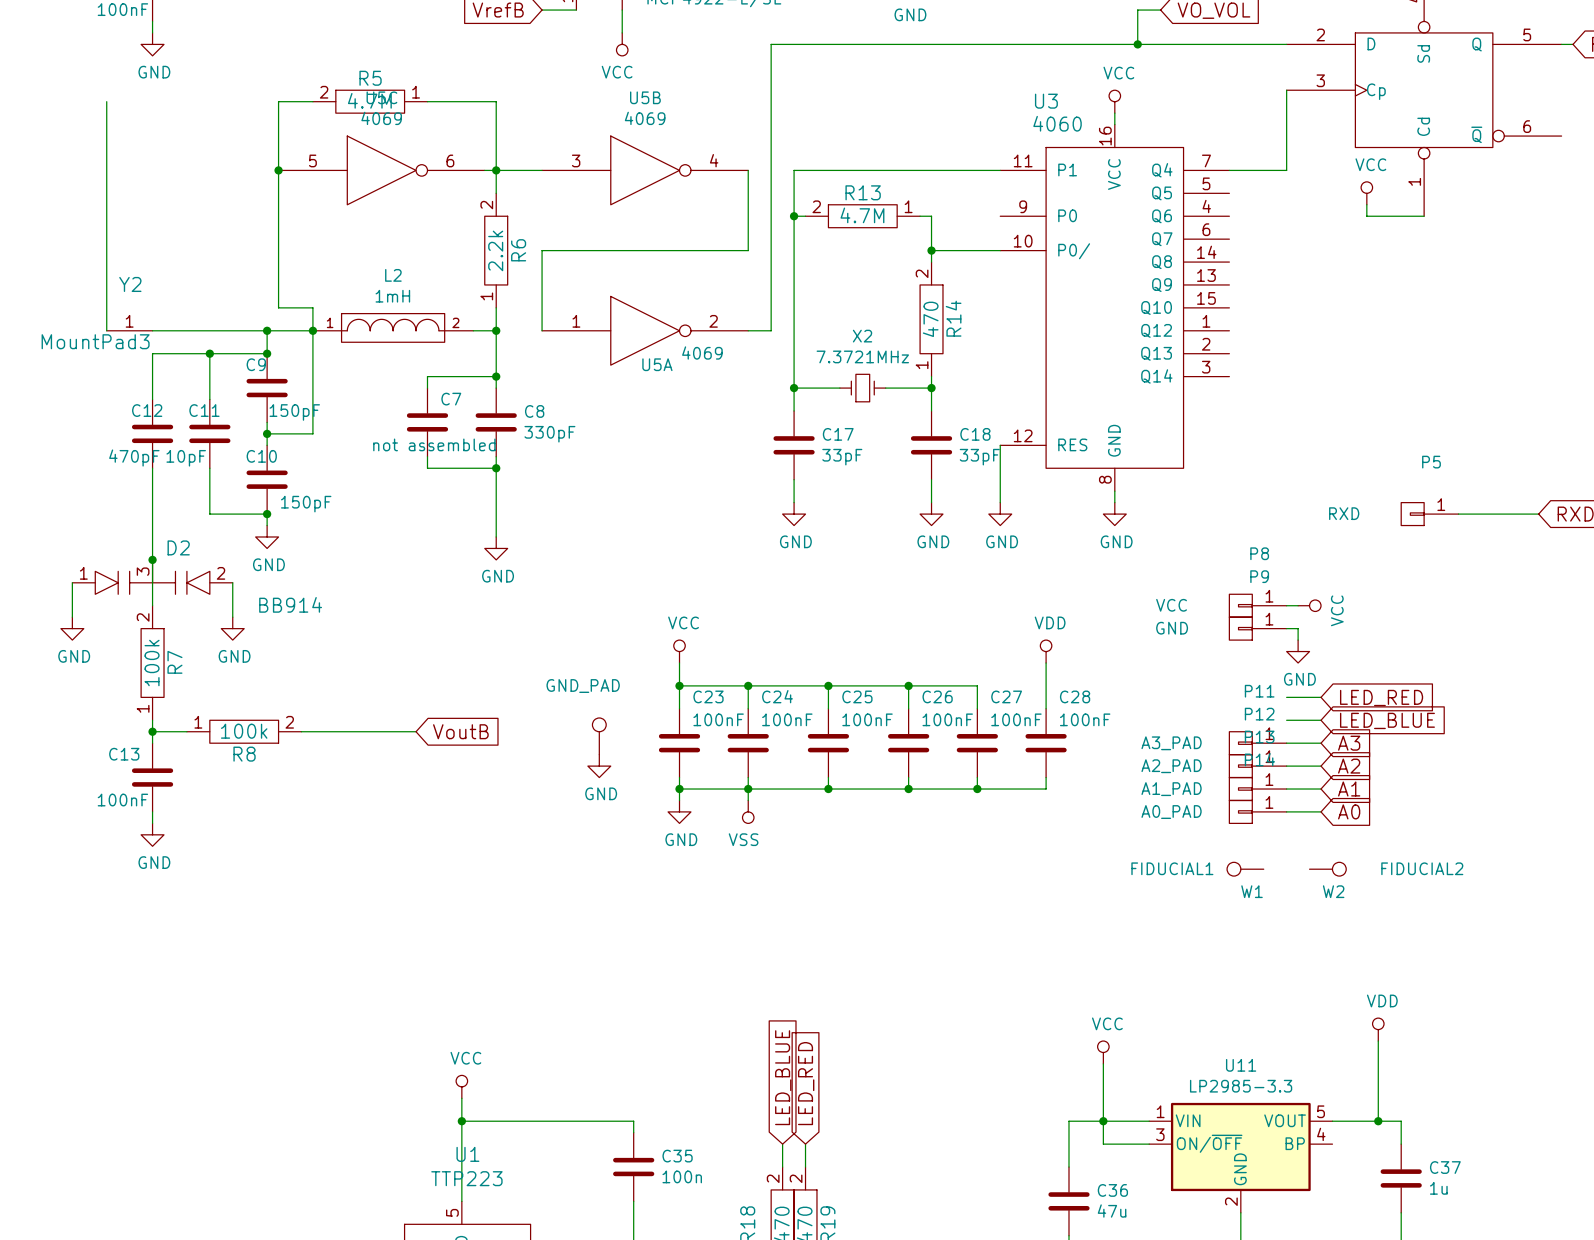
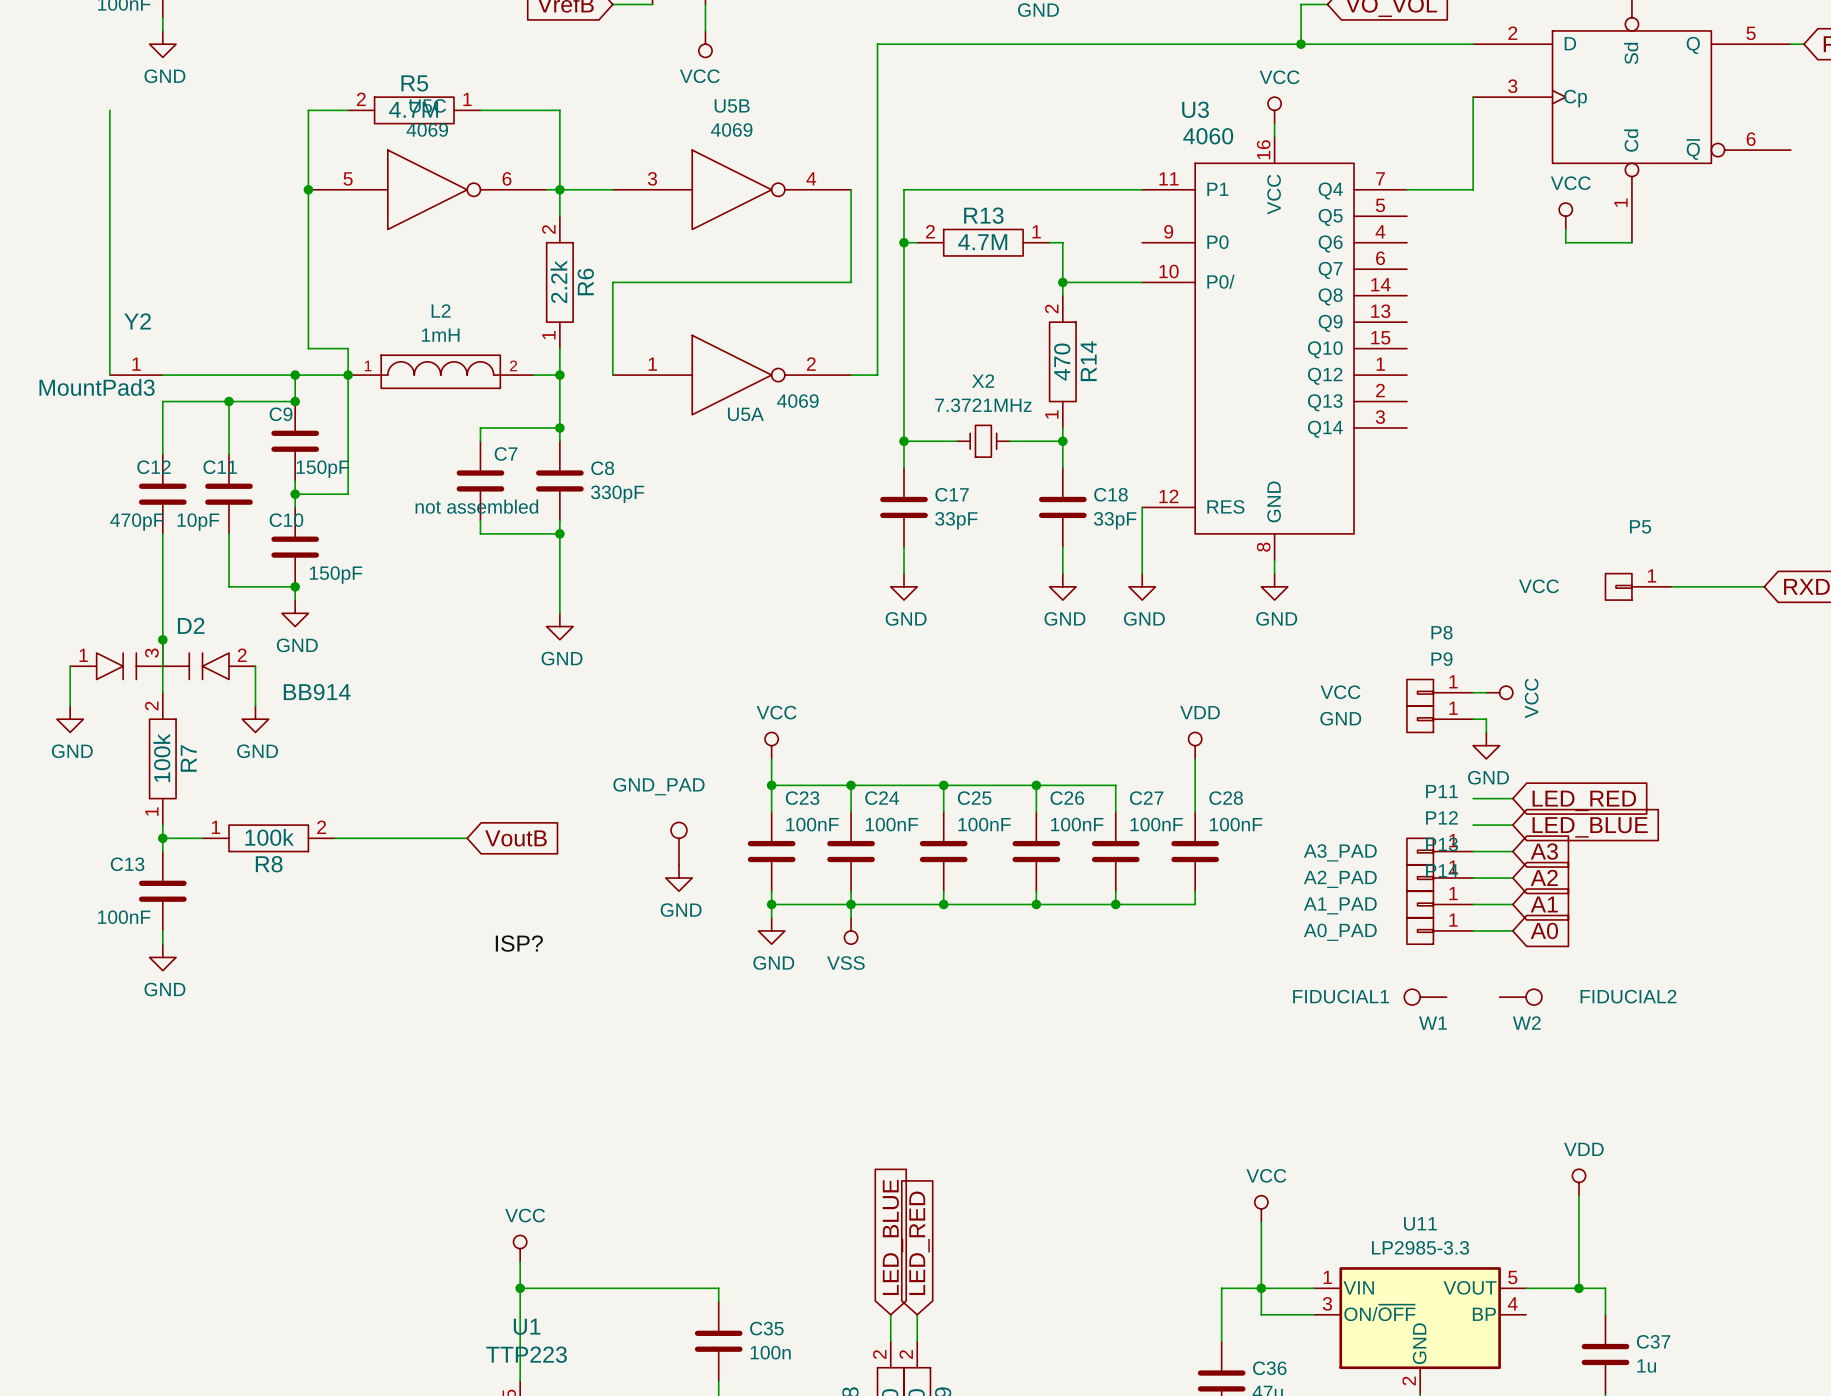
P5 value: RXD (1344, 513) -> VCC (1538, 586)
label: none -> ISP? (519, 943)

